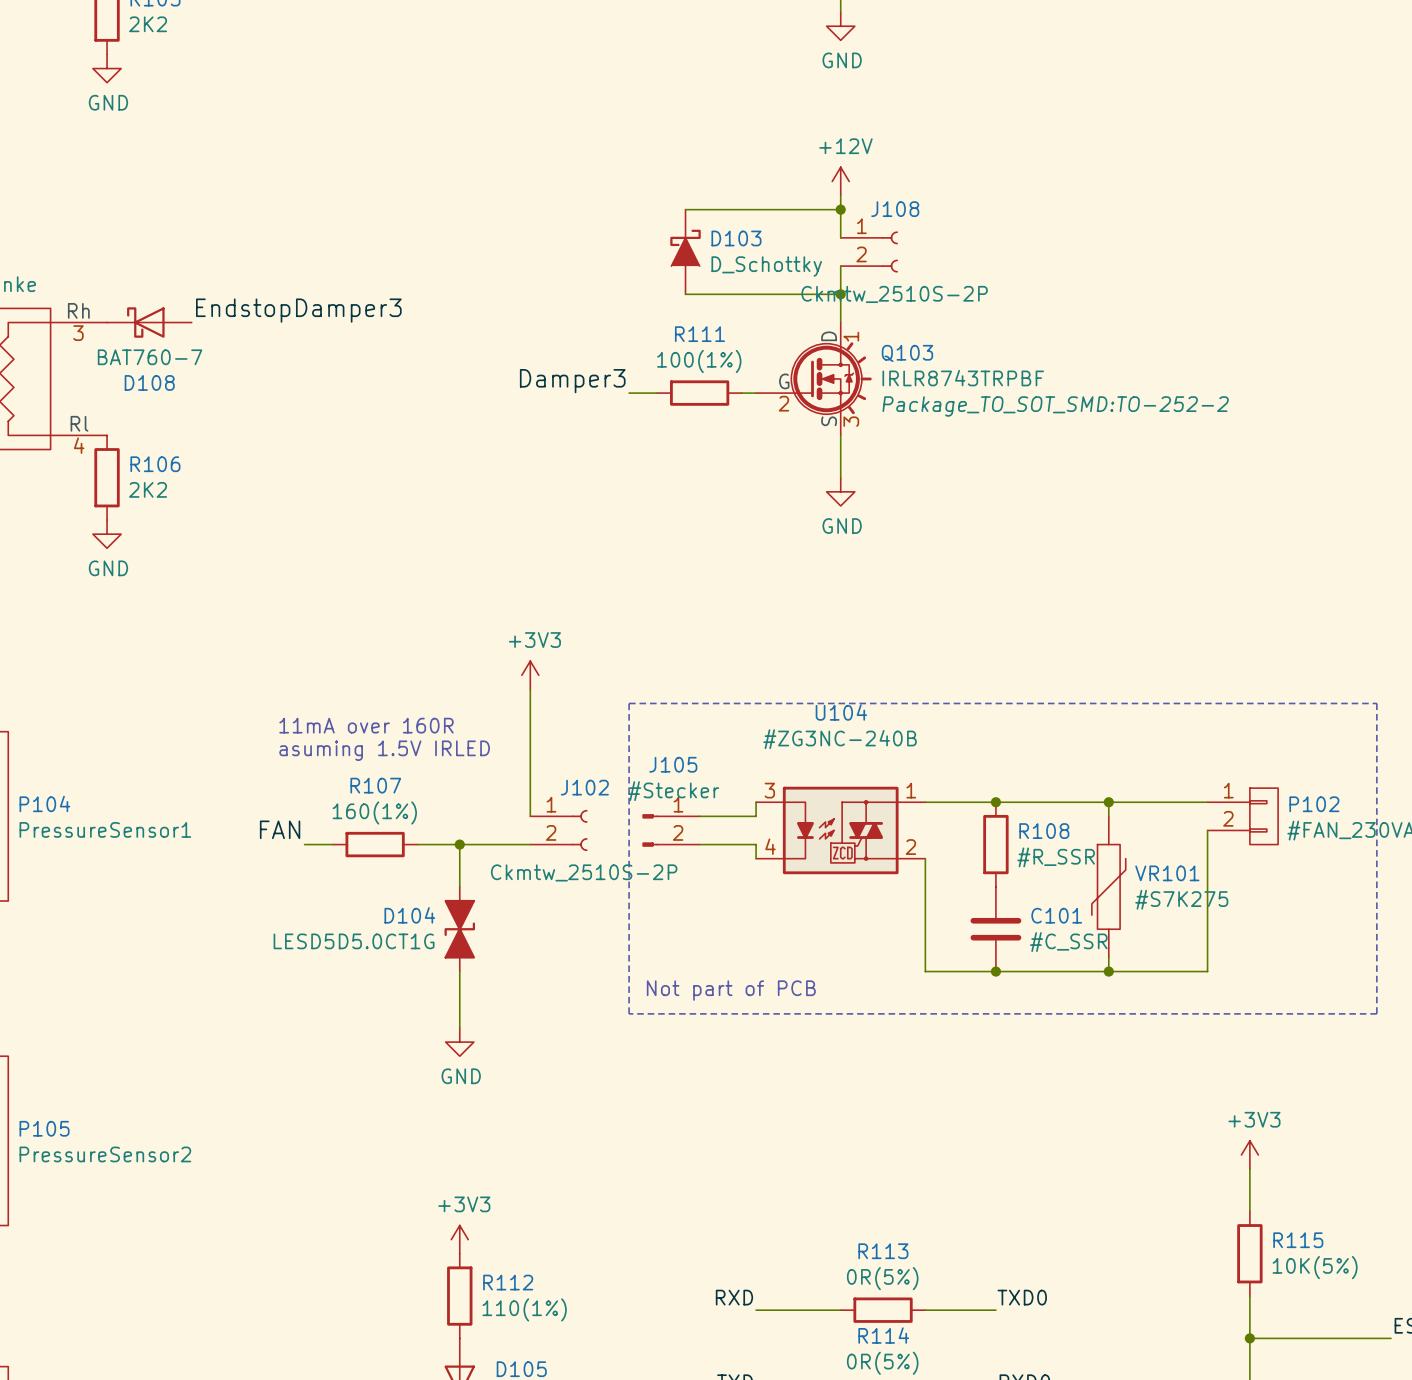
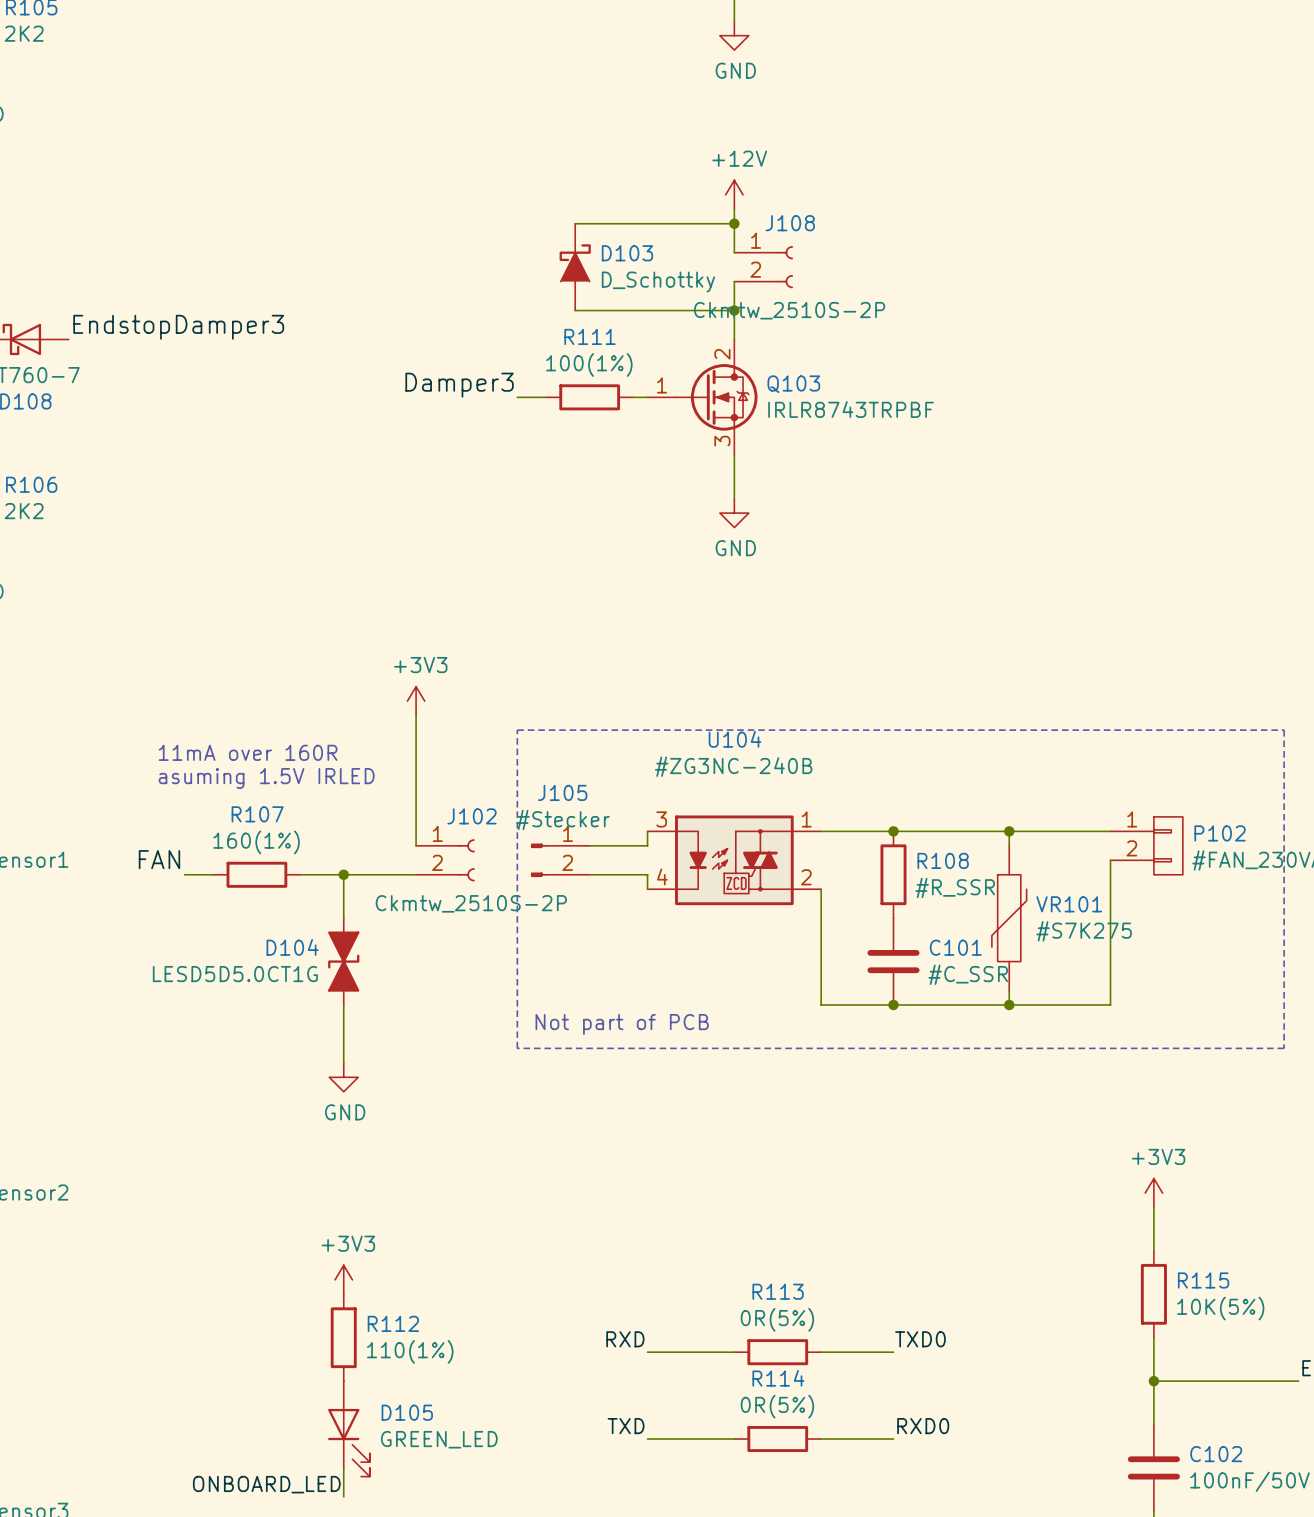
Q103 symbol: [756, 322, 872, 436] -> [647, 339, 758, 456]
label position: Damper3 (572, 381) -> Damper3 (459, 385)
wire: (629, 393) (657, 393) -> (517, 397) (546, 397)
R111 position: (699, 393) -> (589, 397)
wire: (741, 393) (756, 393) -> (633, 397) (647, 397)
Q103 text: Package_TO_SOT_SMD:TO-252-2 (1055, 406) -> none

